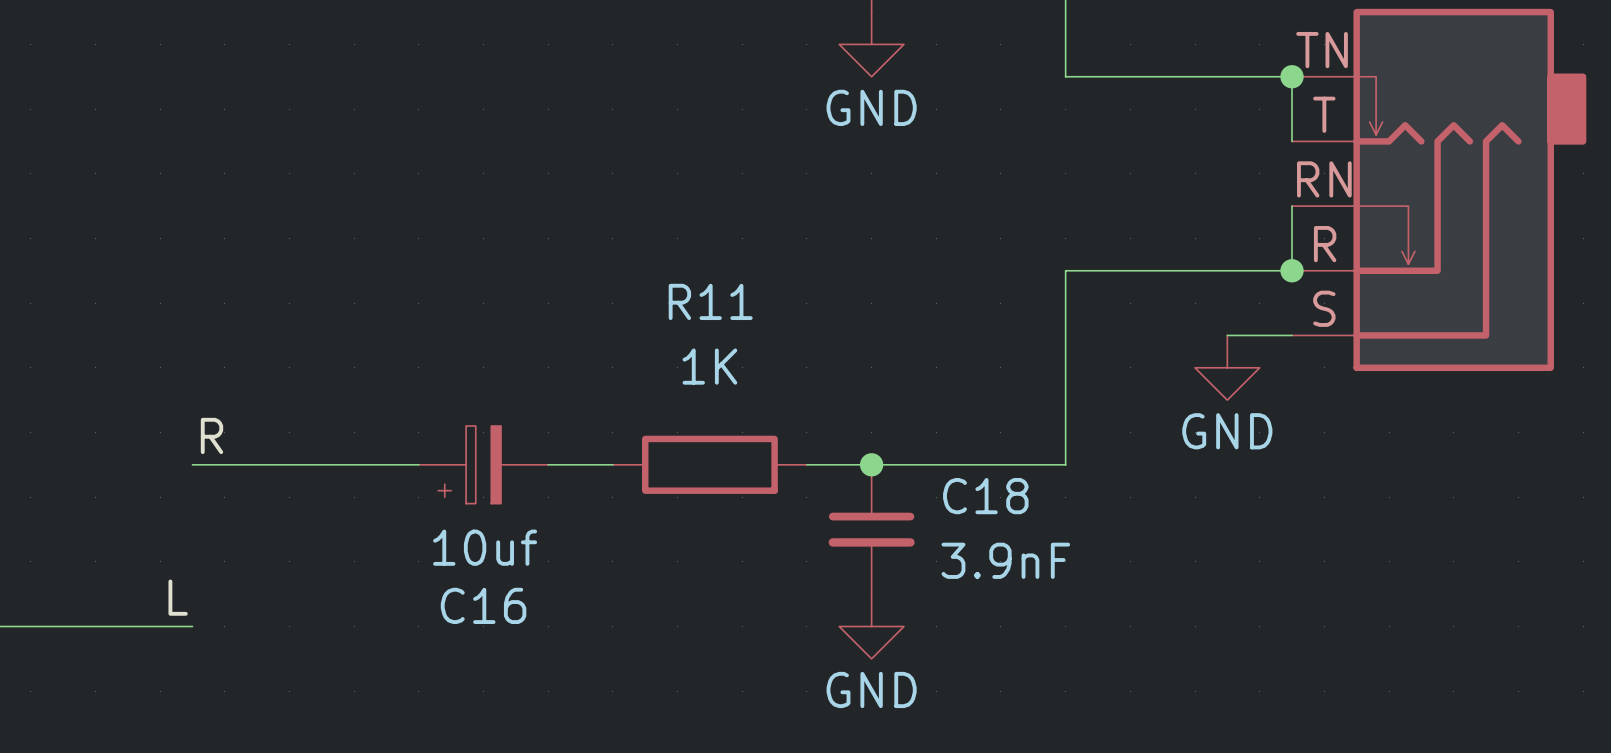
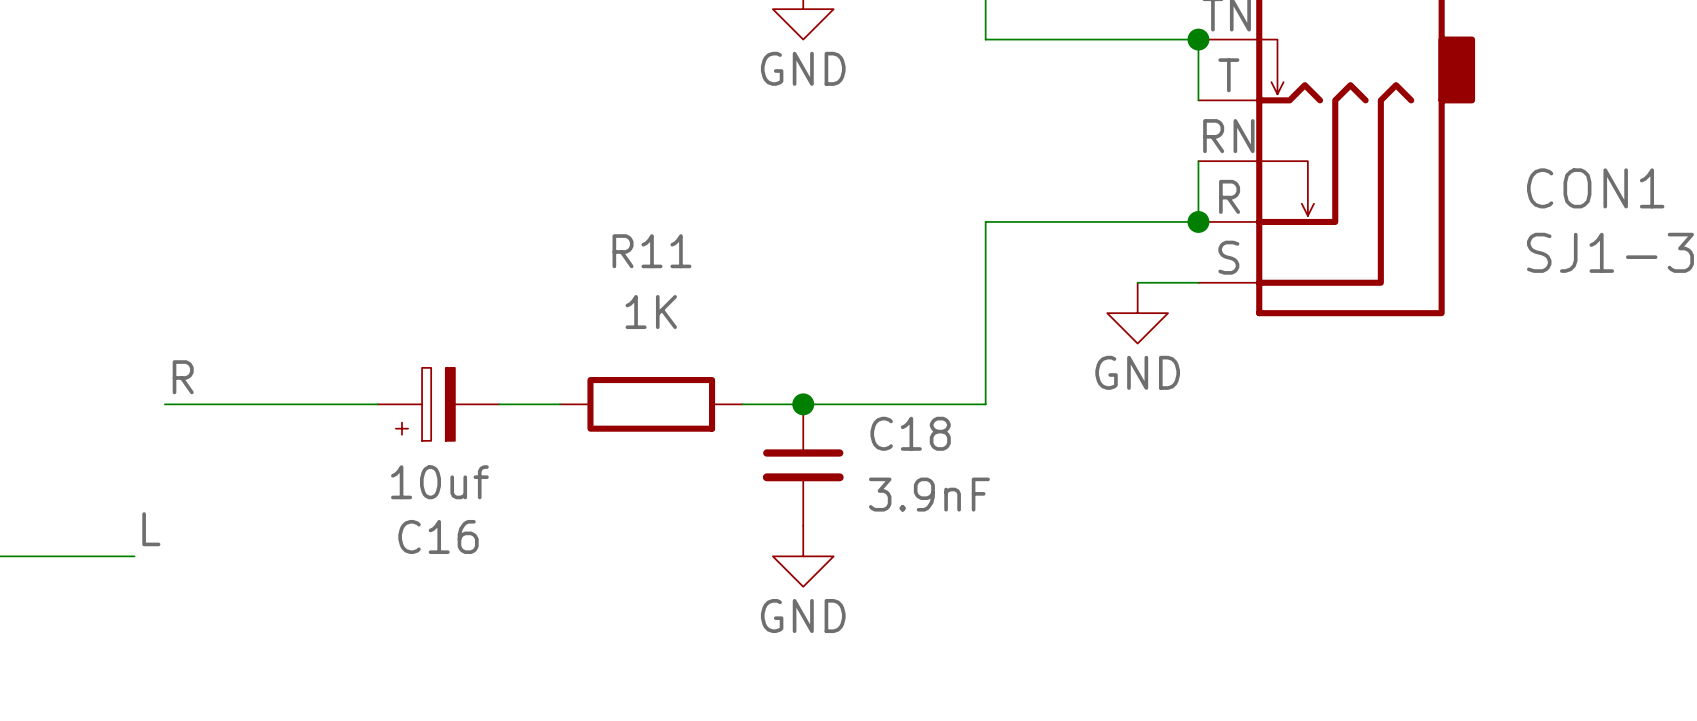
wire: (160, 626) (192, 626) -> none

